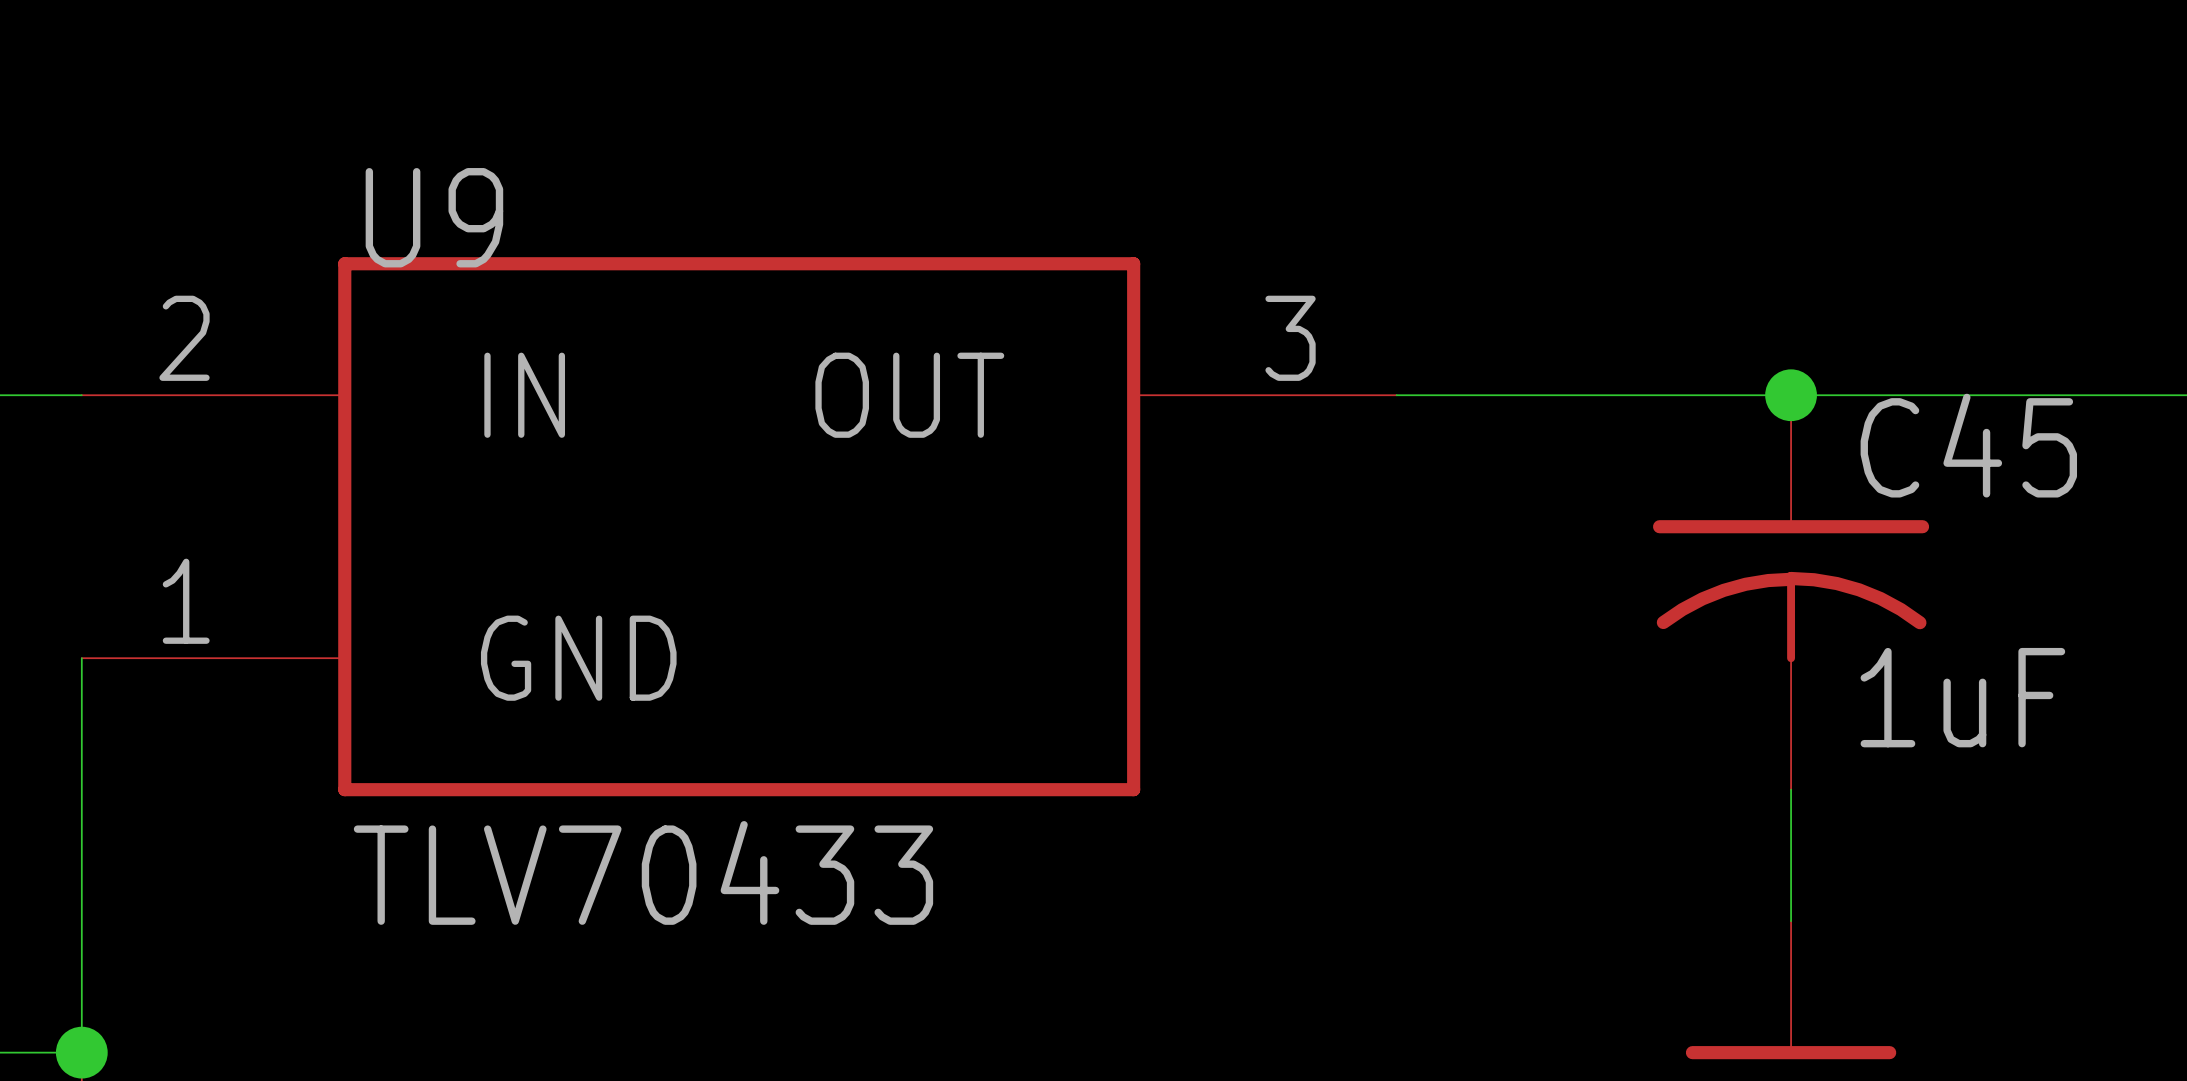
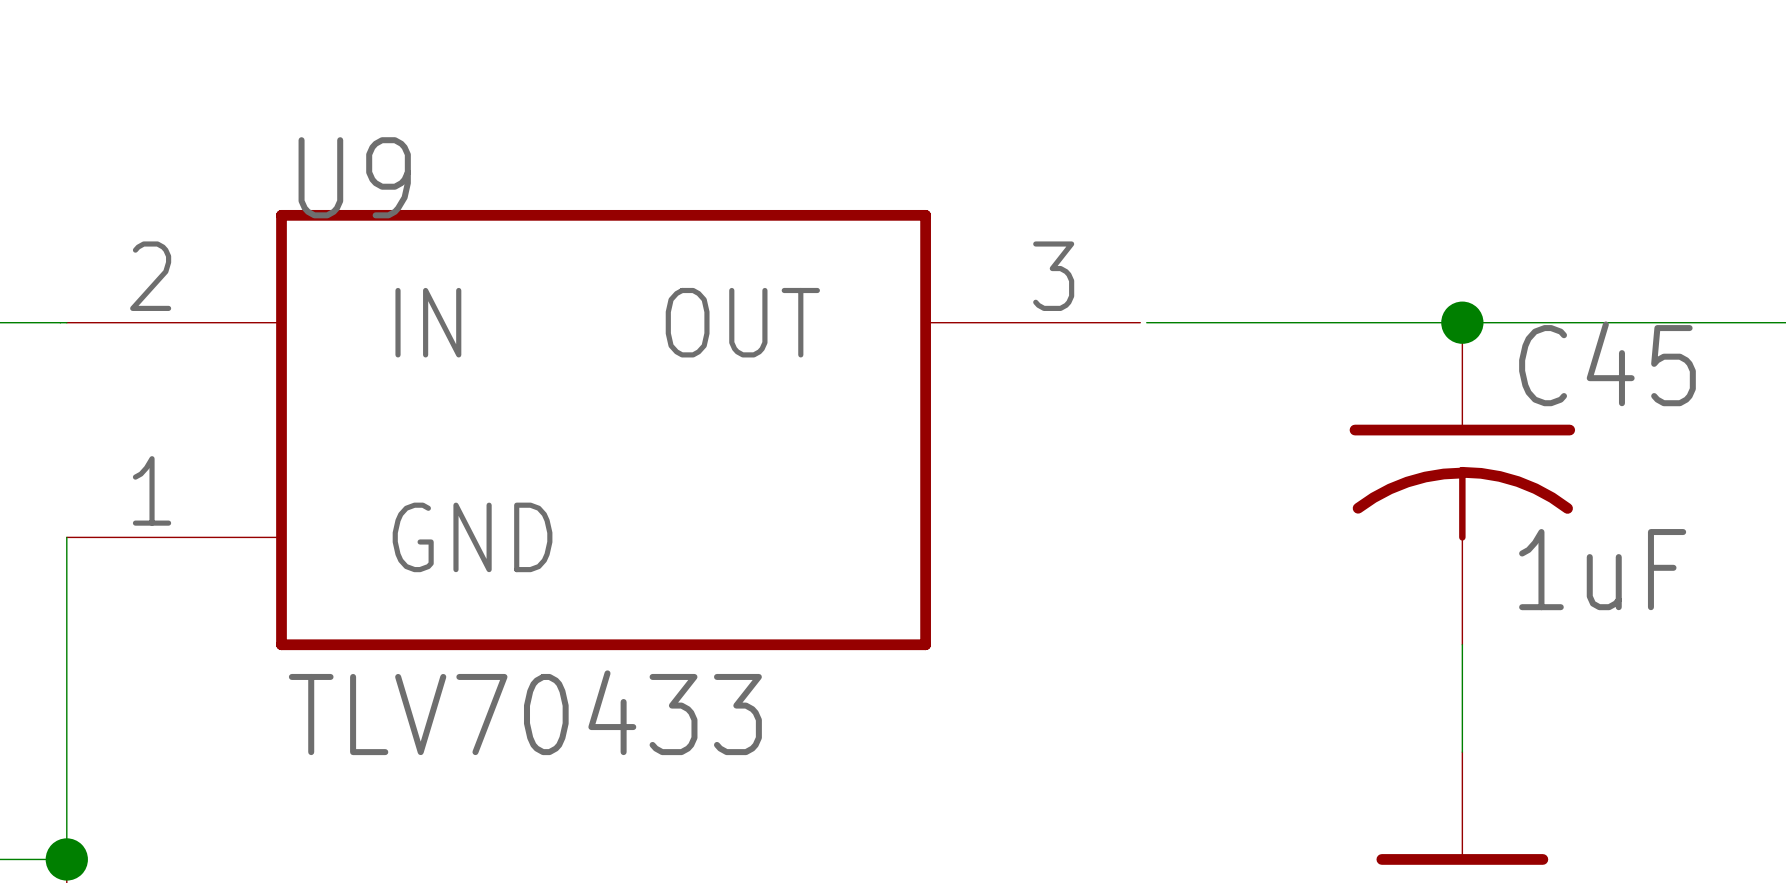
wire: (1396, 395) (1404, 395) -> none

